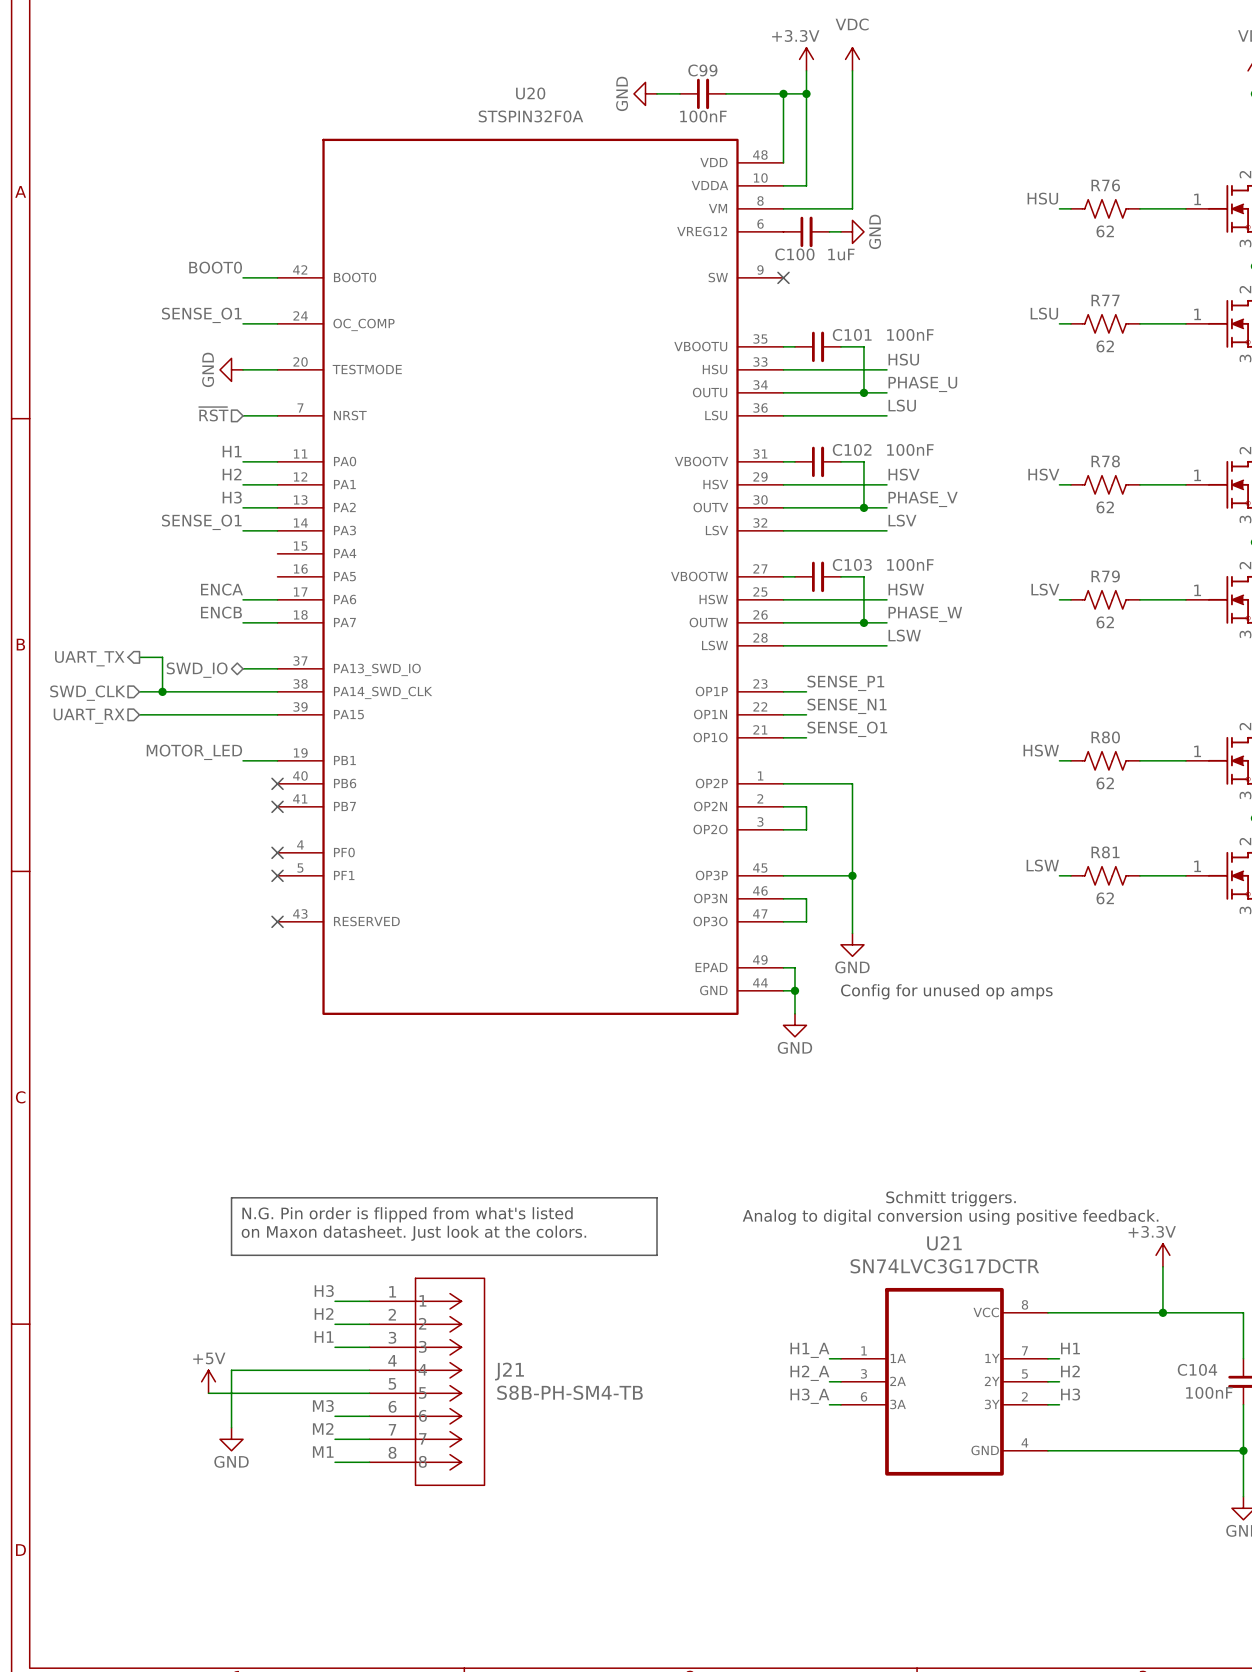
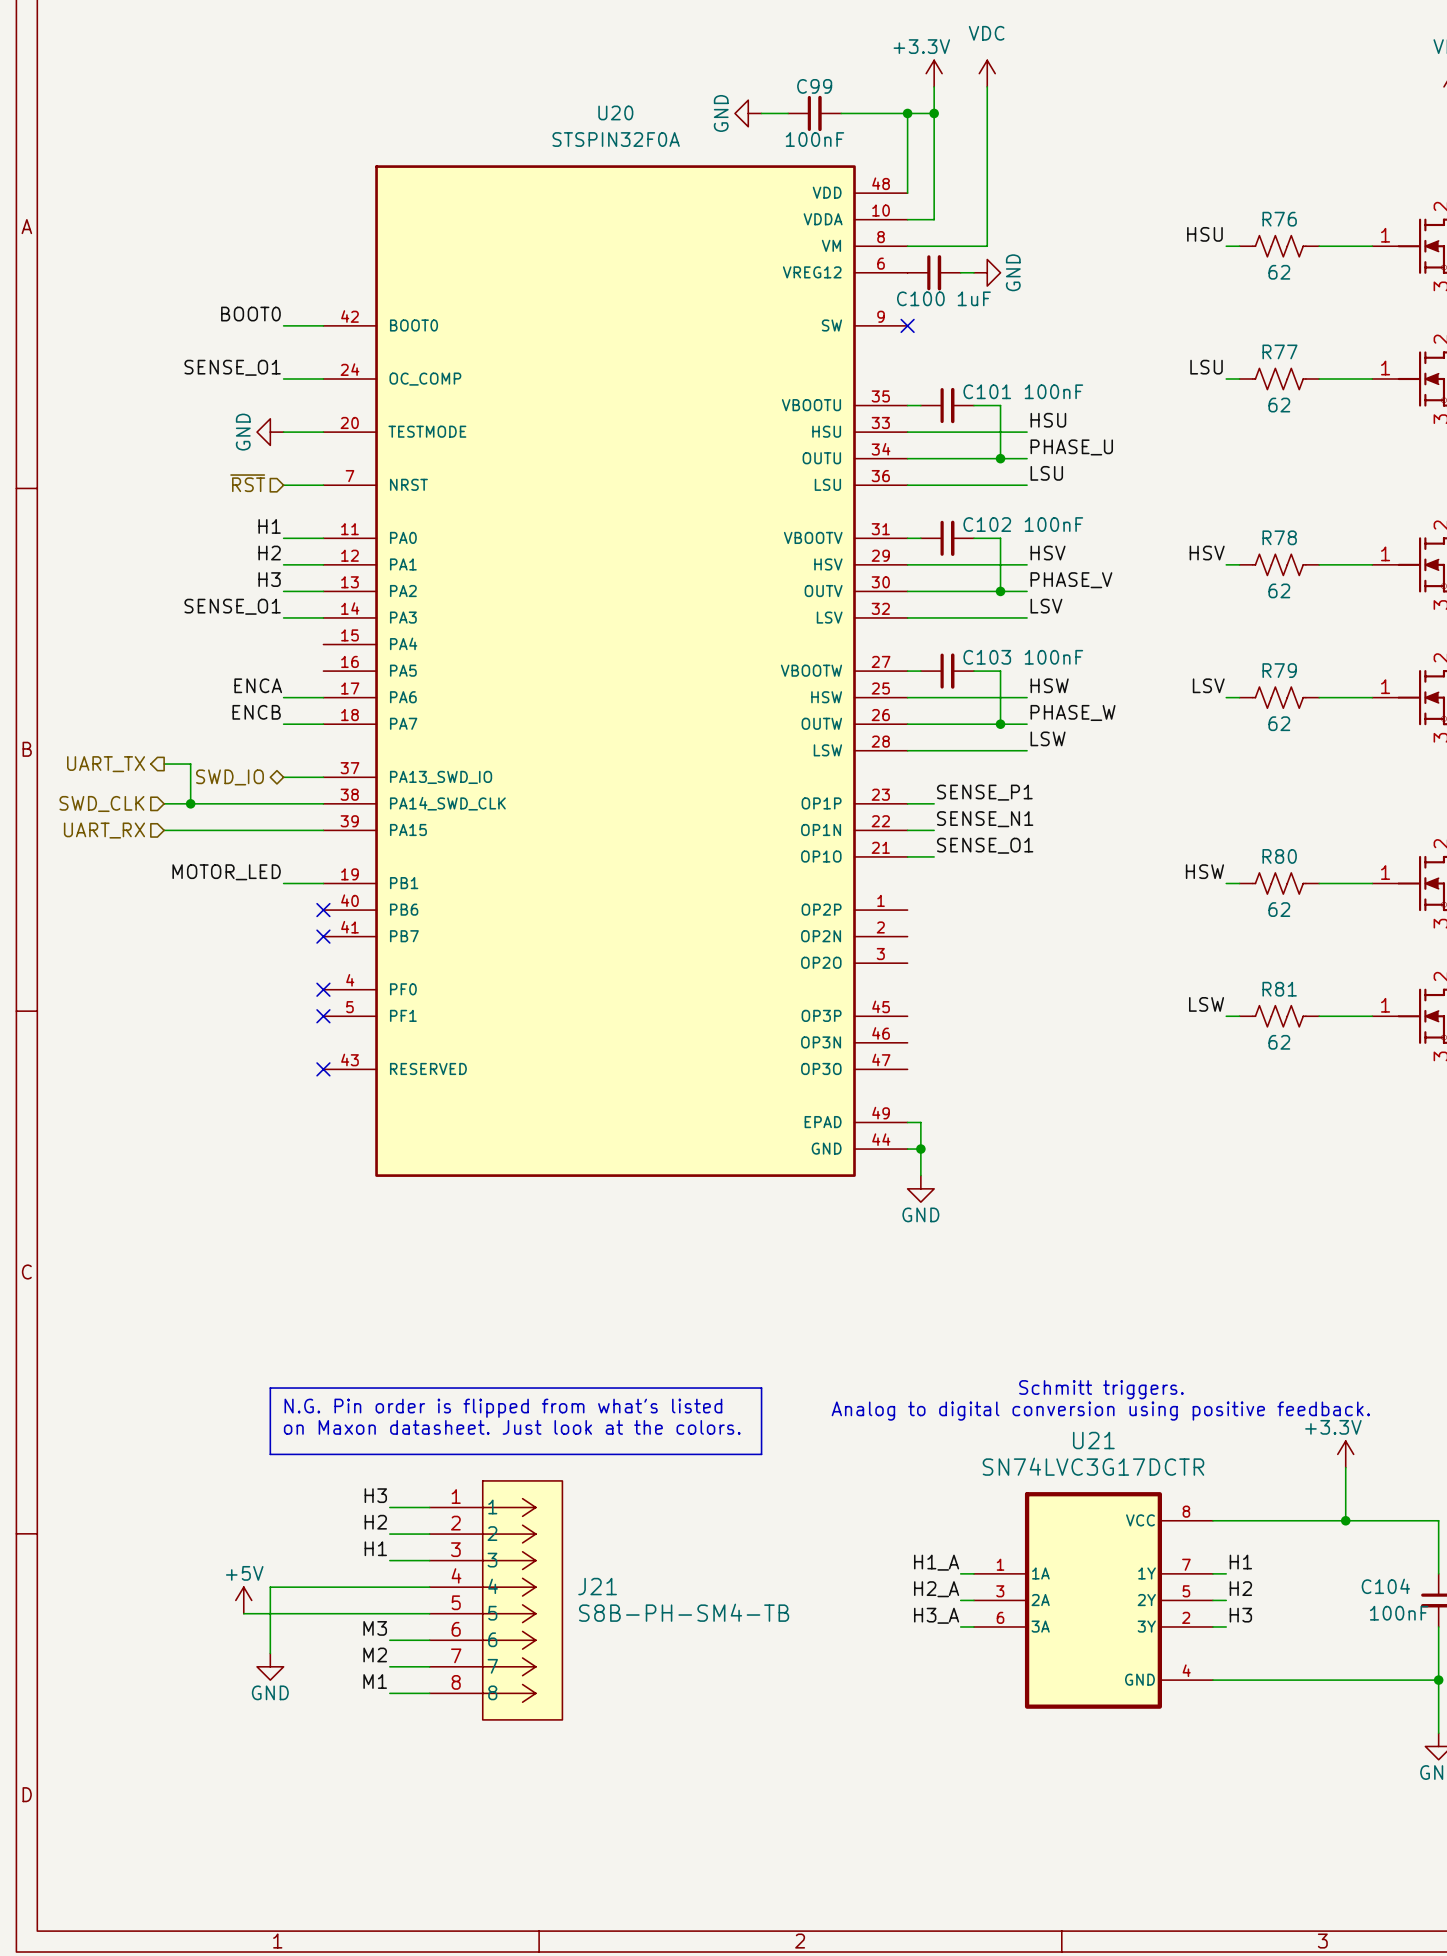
wire: (783, 783) (852, 783) (852, 933) -> none
wire: (783, 806) (806, 806) (806, 829) (783, 829) -> none
wire: (783, 875) (852, 875) -> none
junction: (852, 875) -> none
wire: (783, 898) (806, 898) (806, 921) (783, 921) -> none
power symbol: GND (852, 944) -> none
text: Config for unused op amps (946, 991) -> none

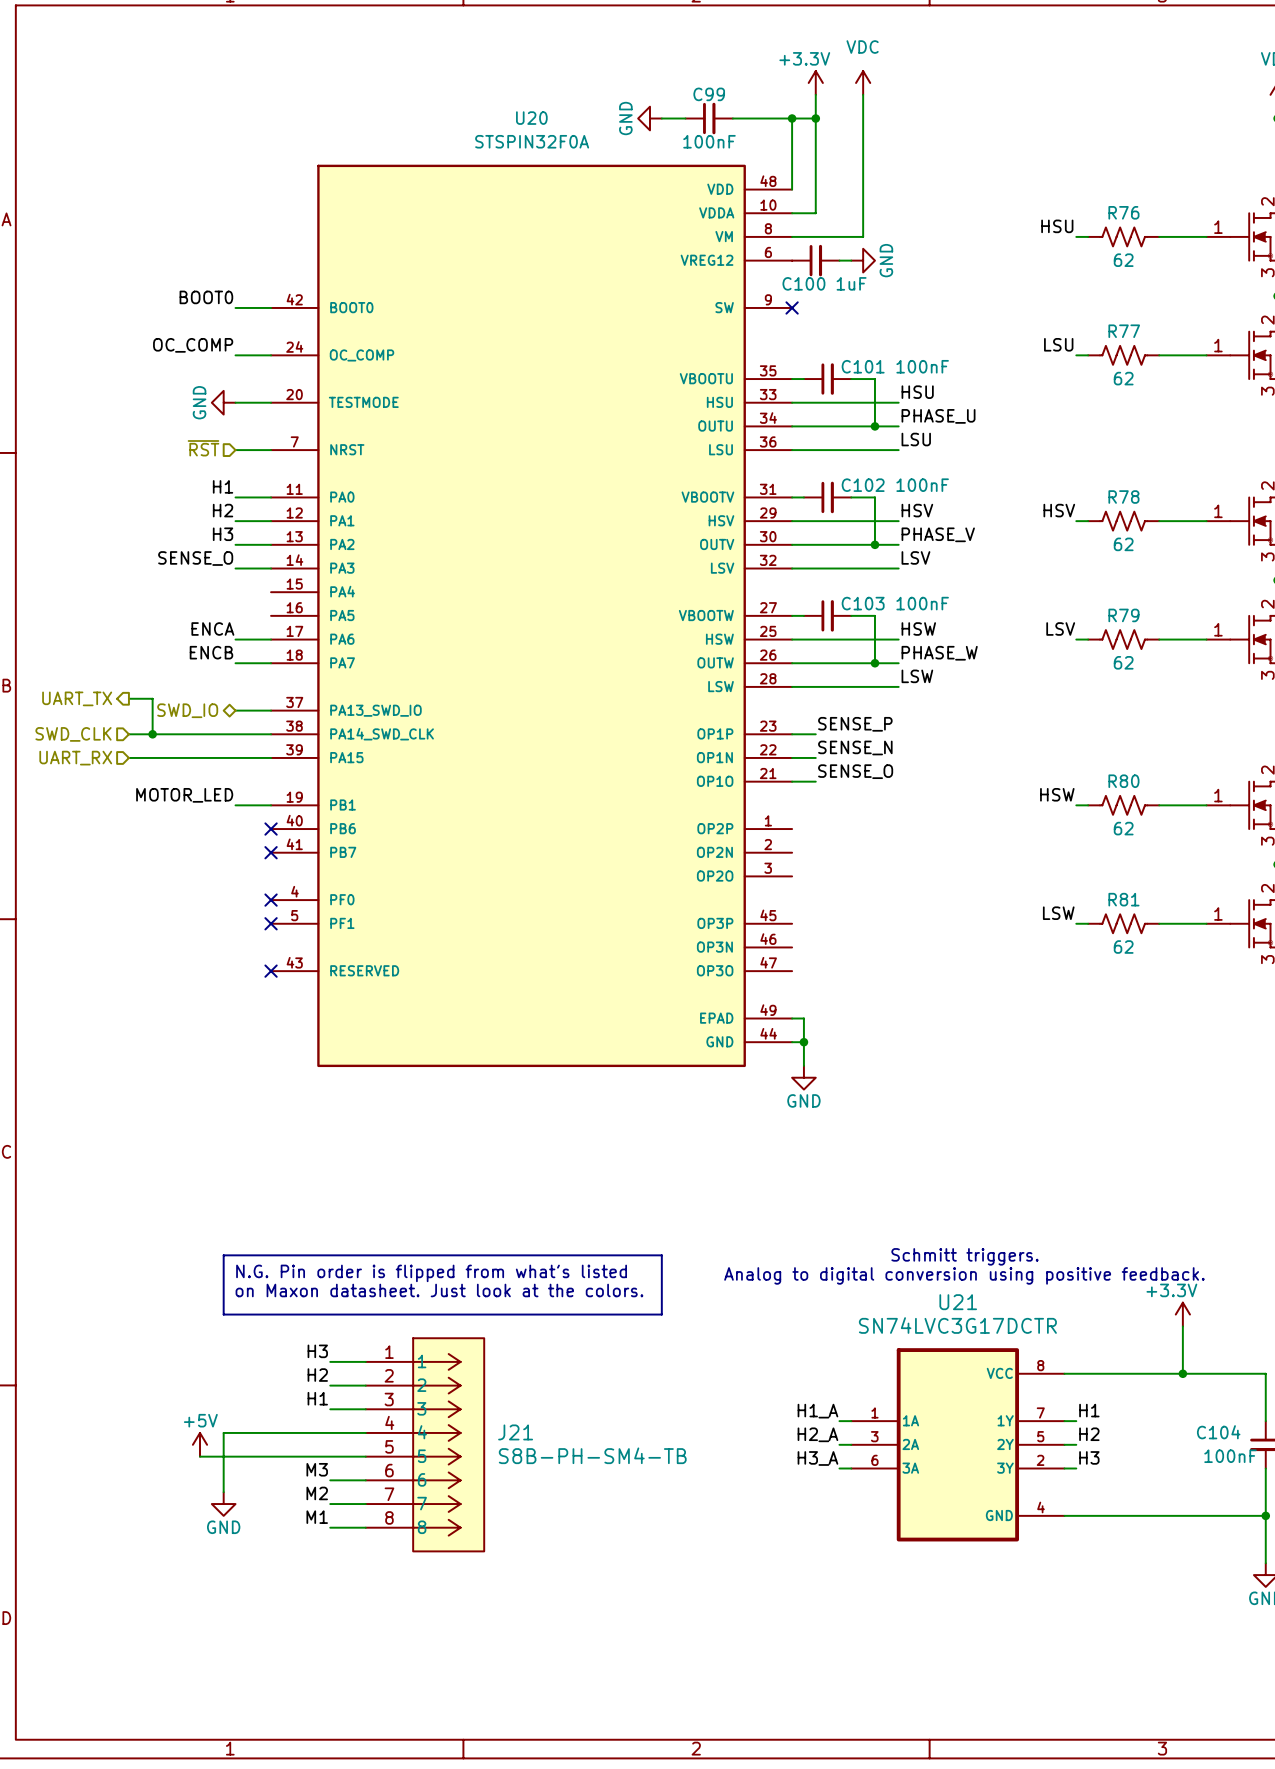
label: SENSE_O1 (232, 367) -> OC_COMP (193, 345)
label: SENSE_O1 (232, 606) -> SENSE_O (195, 558)
label: SENSE_P1 (984, 792) -> SENSE_P (855, 724)
label: SENSE_N1 (985, 819) -> SENSE_N (855, 747)
label: SENSE_O1 (985, 845) -> SENSE_O (855, 771)

